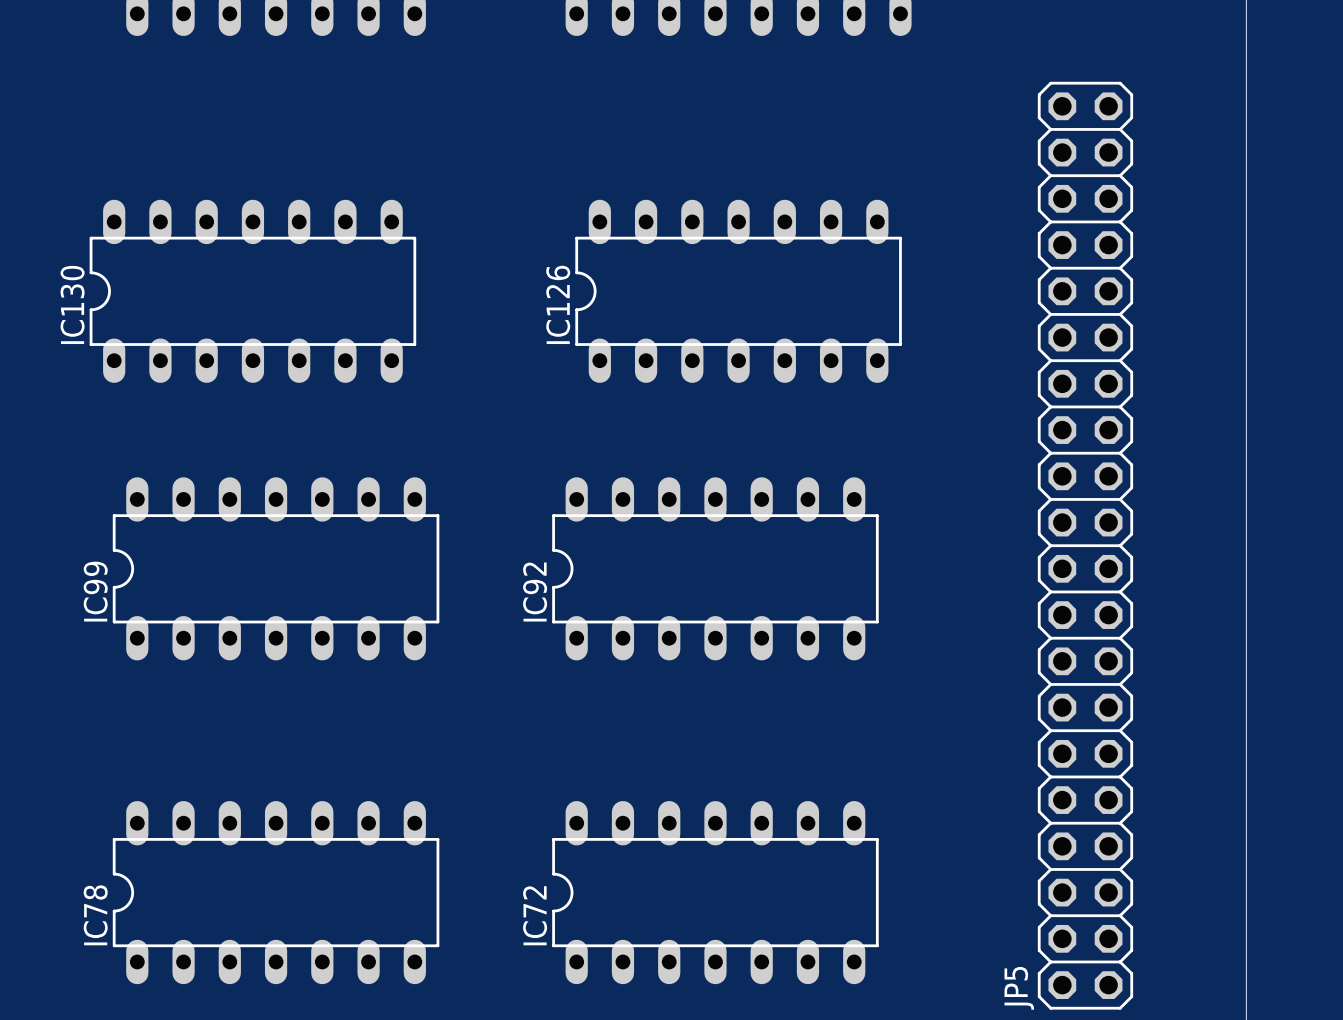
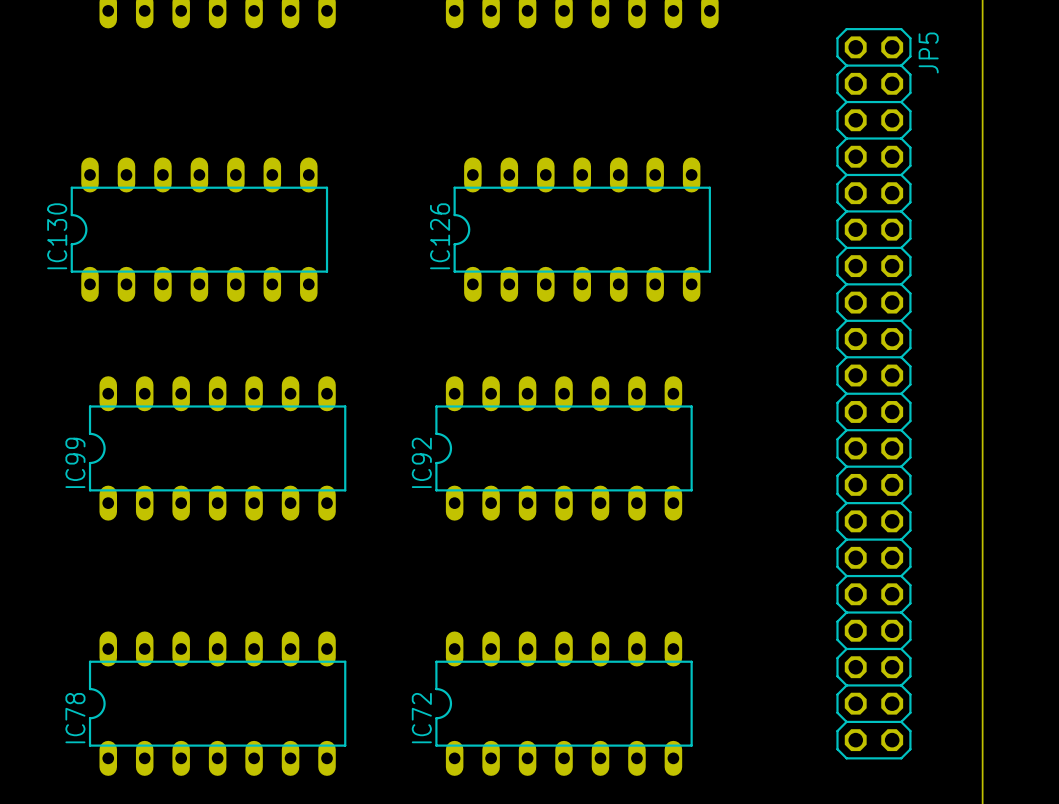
JP5 position: (1085, 545) -> (873, 393)
JP5 name position: JP5 (1019, 988) -> JP5 (928, 52)

